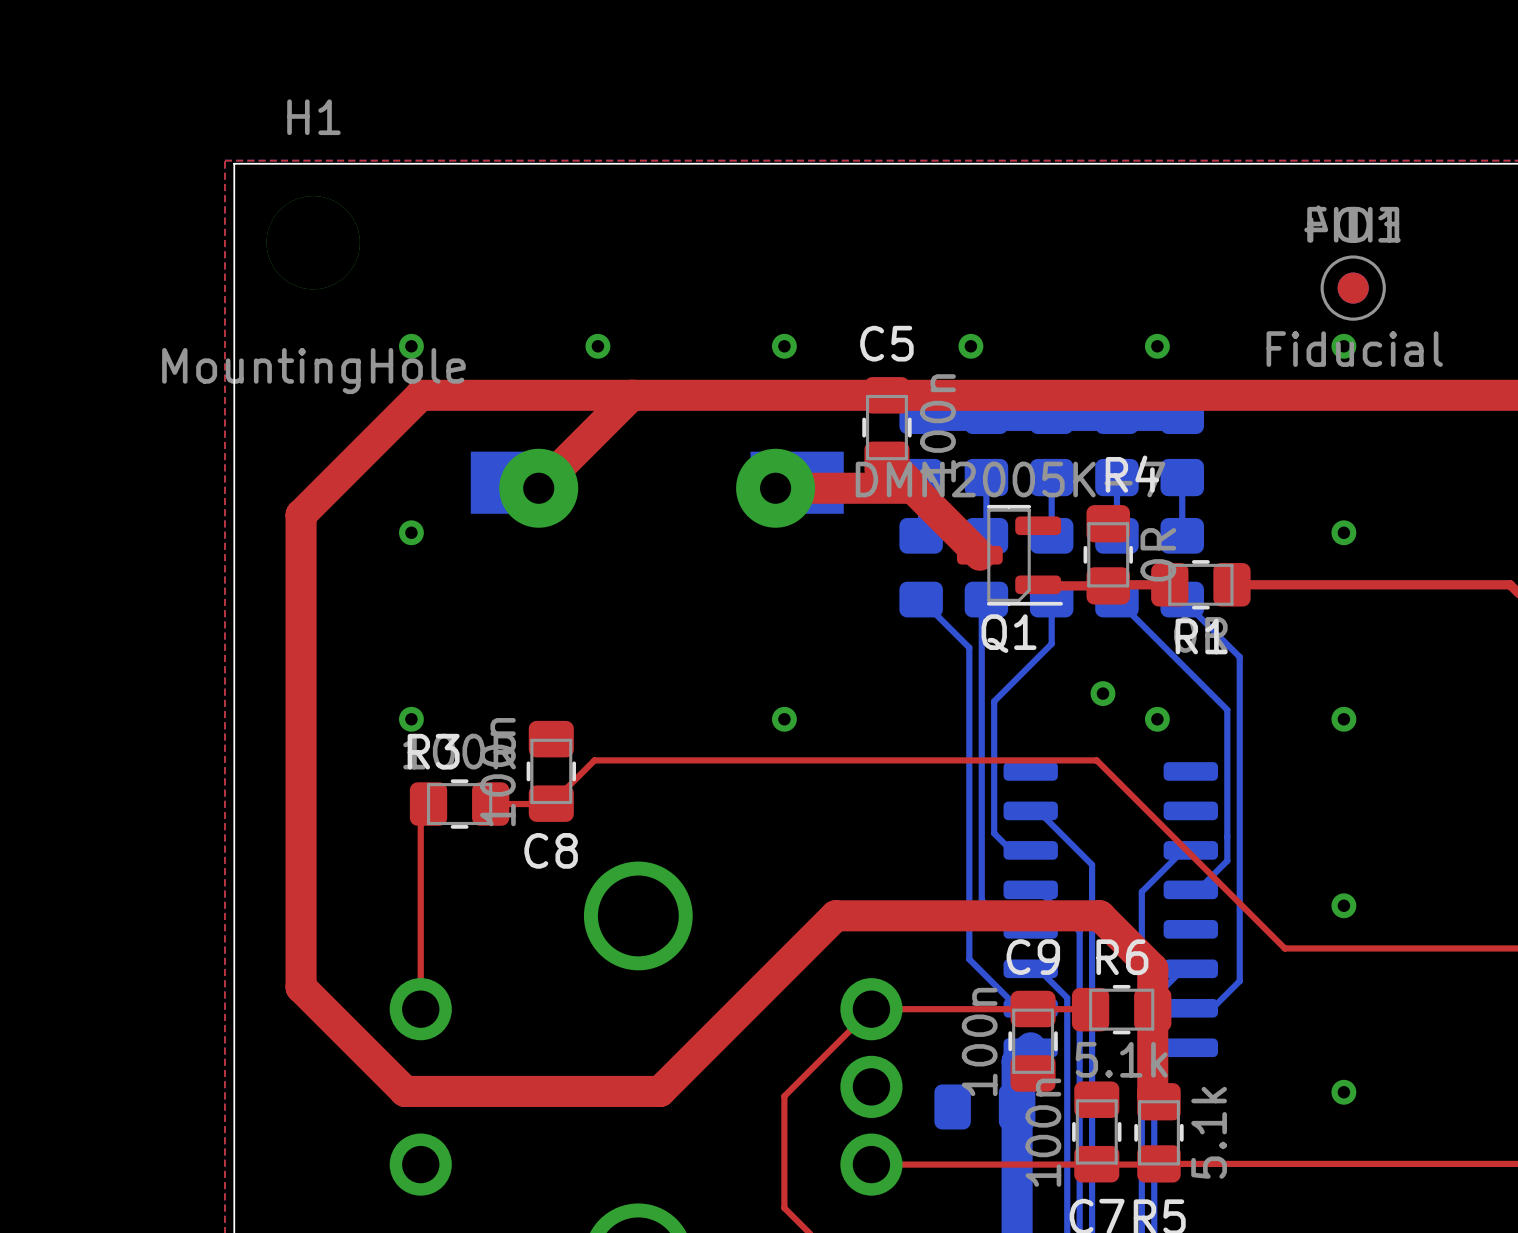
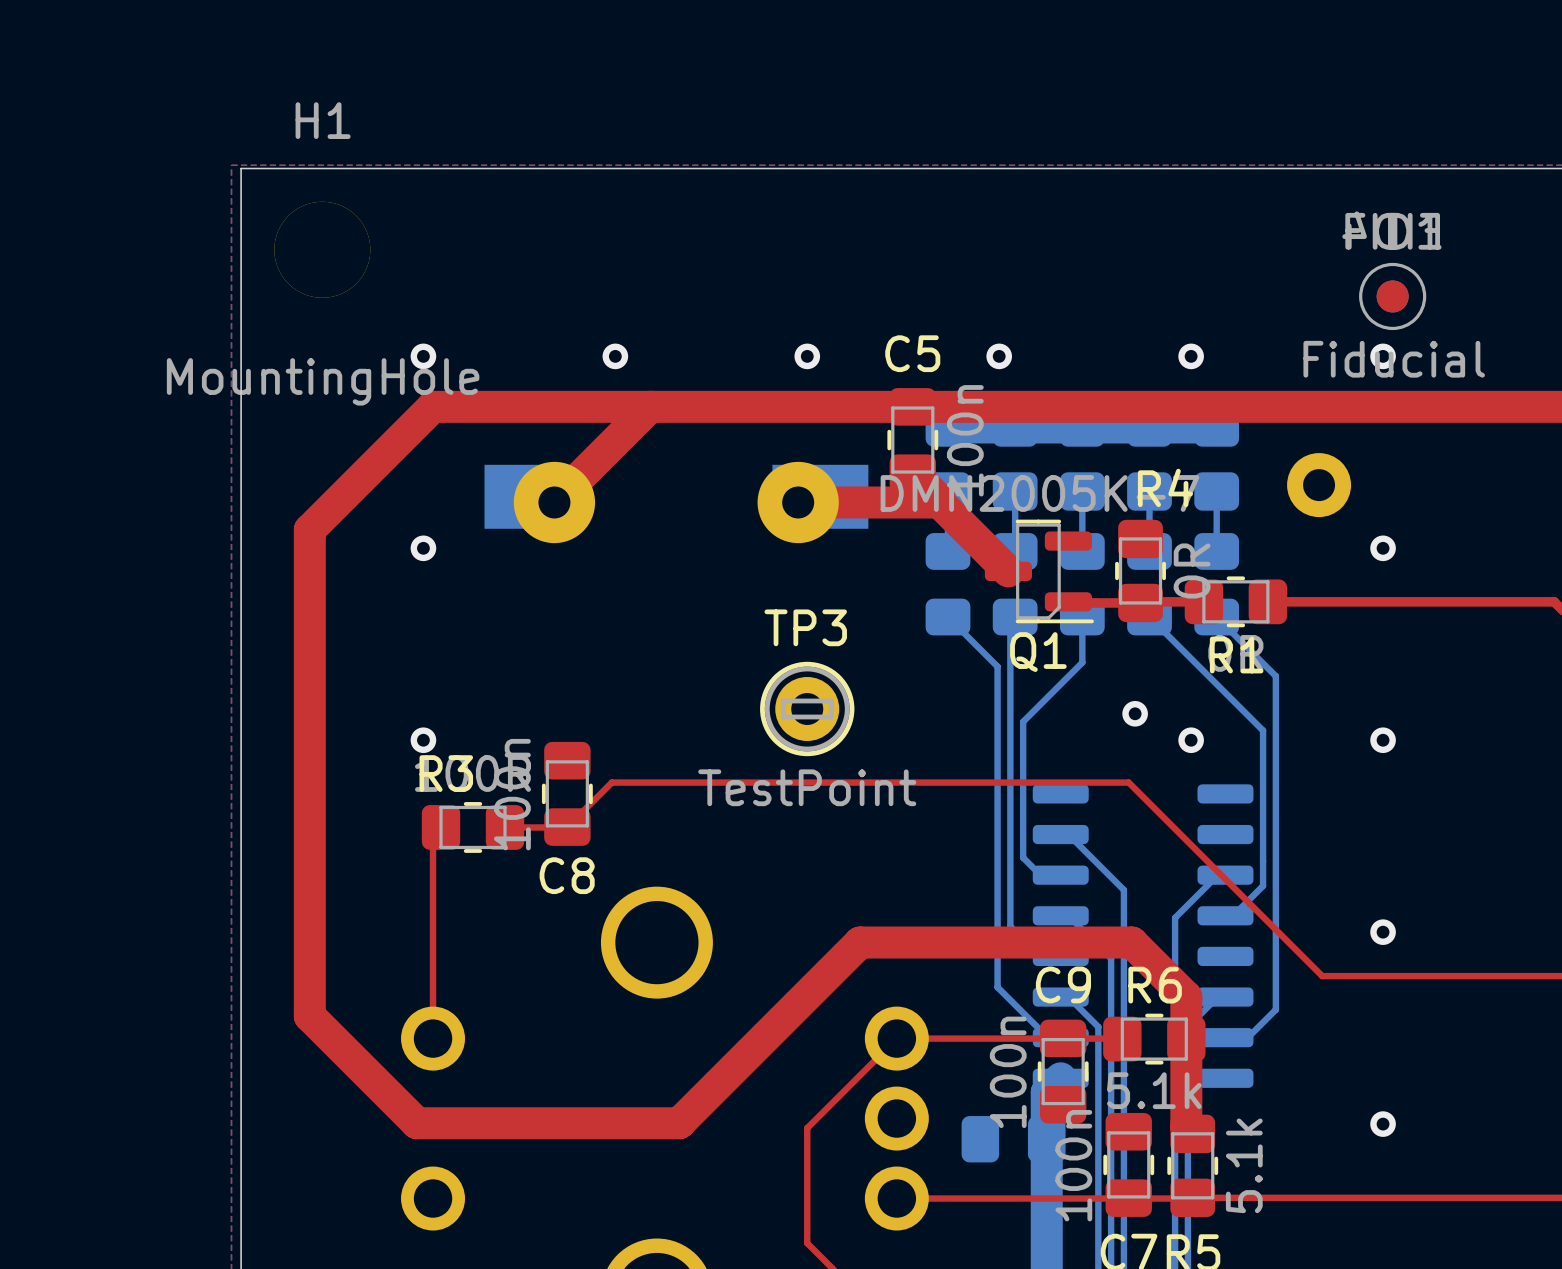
part: none -> (1319, 485)
TP3: none -> TestPoint (807, 708)
via: (784, 719) -> none

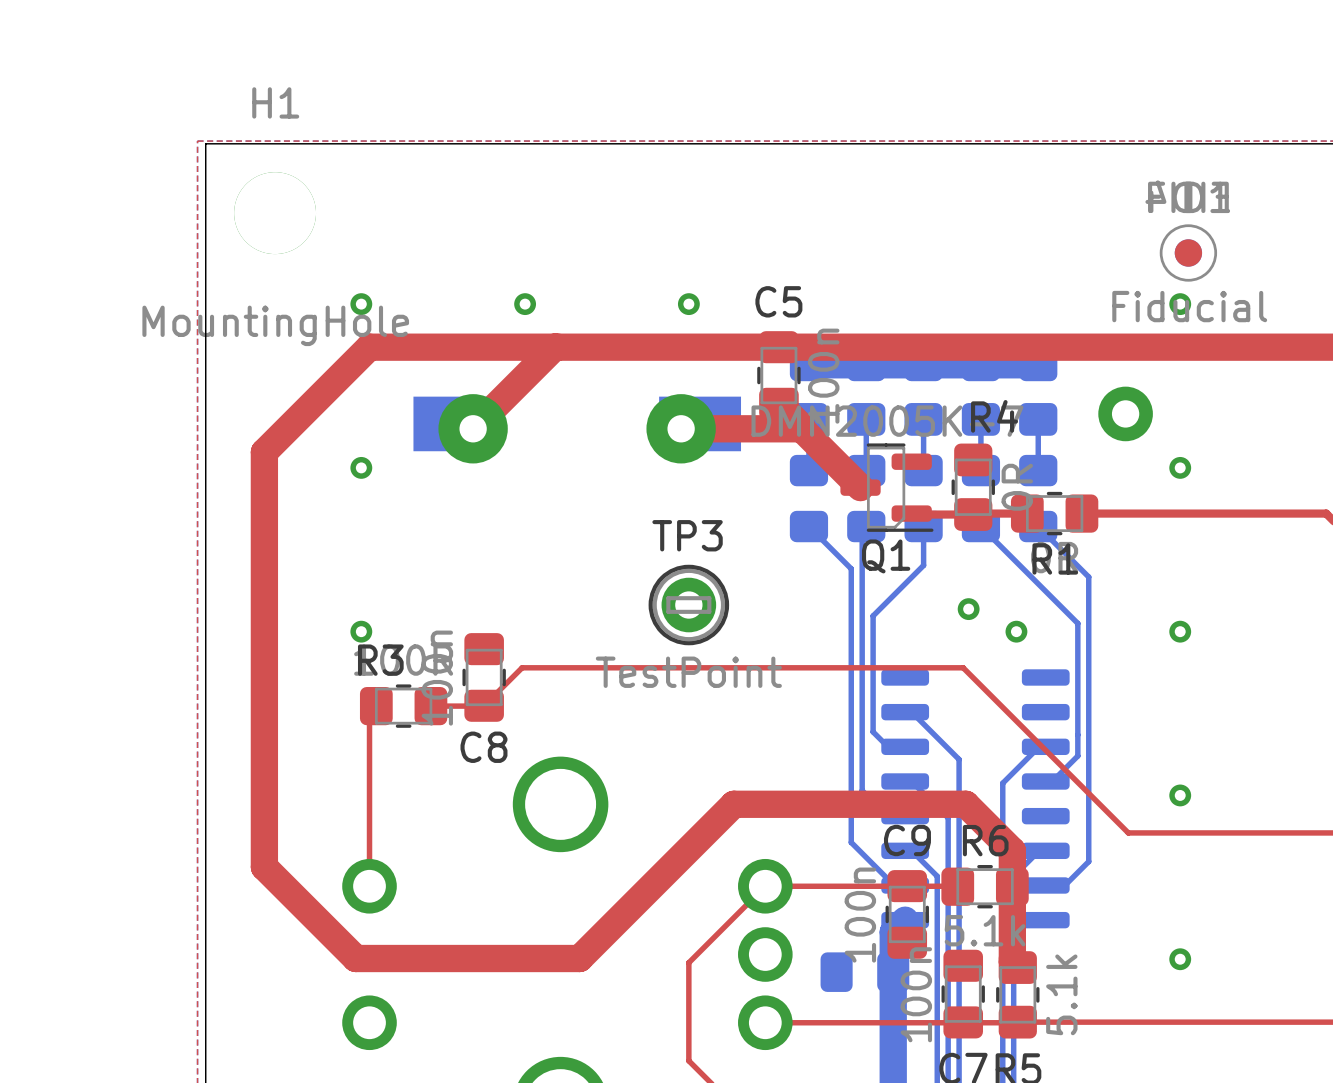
via: (999, 356) -> none
via: (1191, 356) -> none

